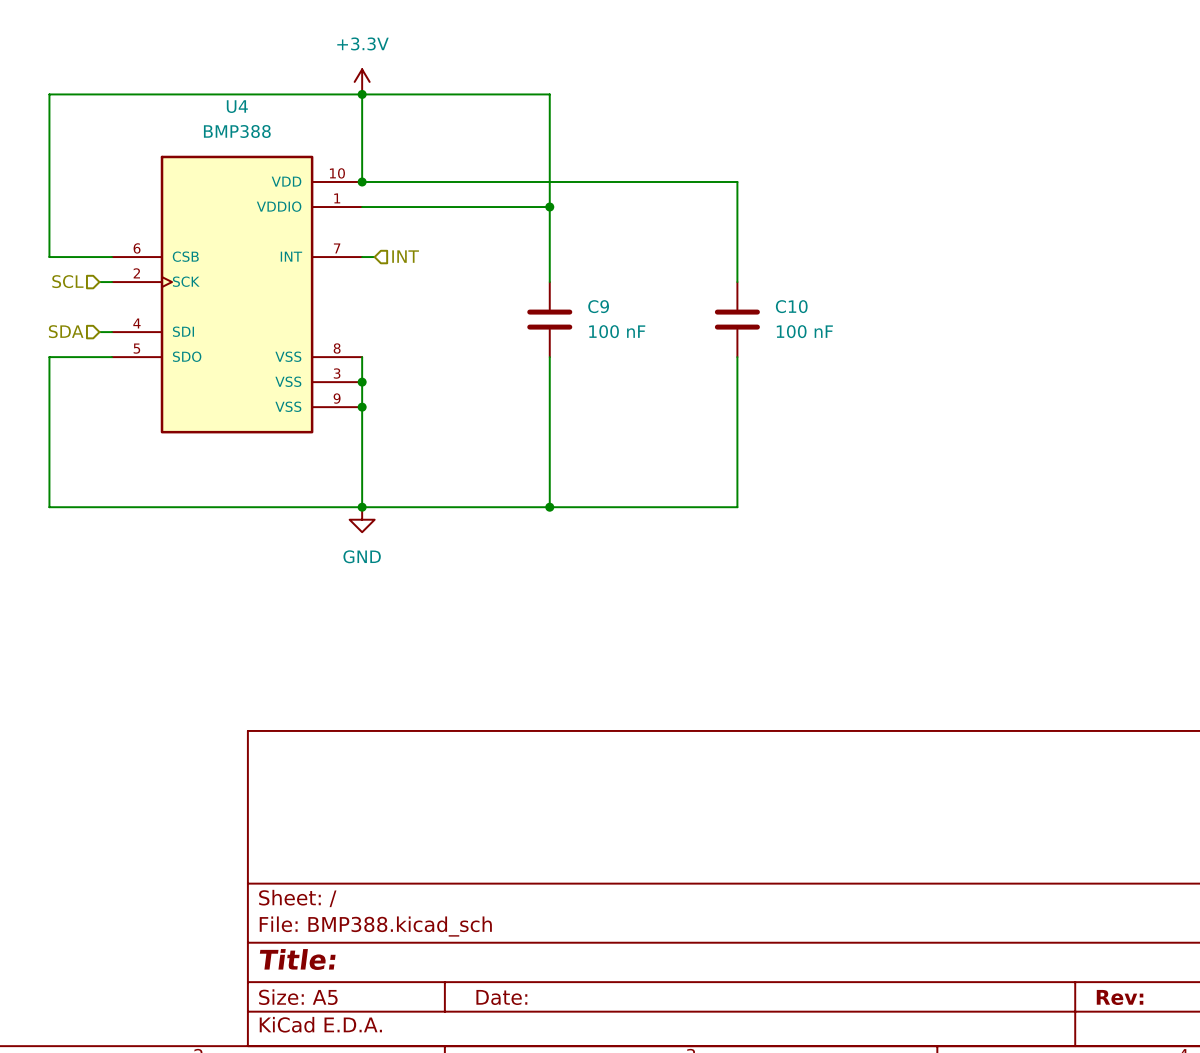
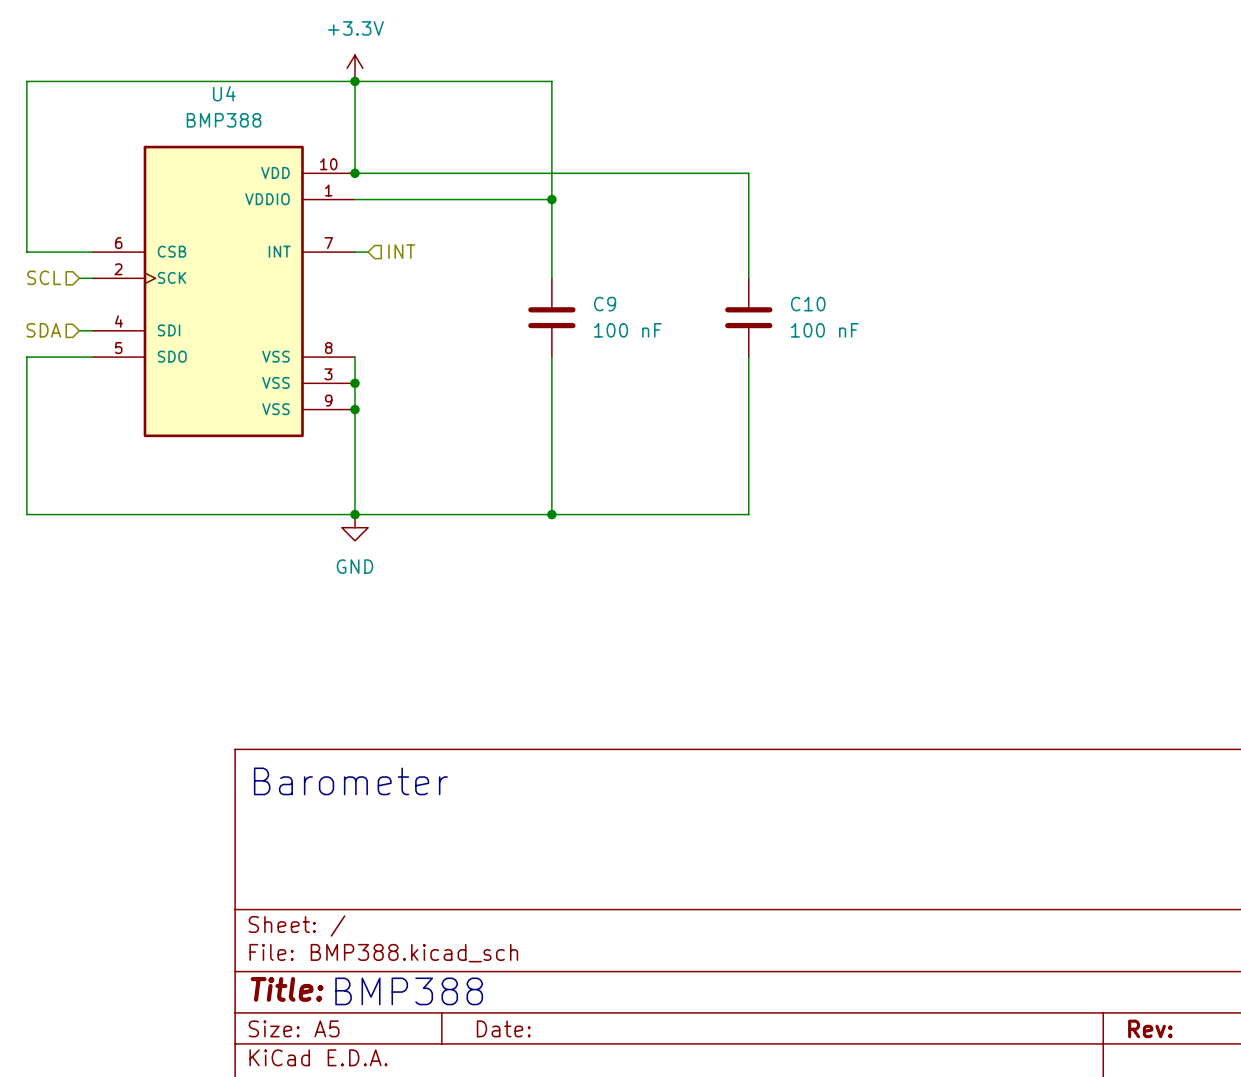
text: none -> Barometer (350, 781)
text: none -> BMP388 (409, 991)

